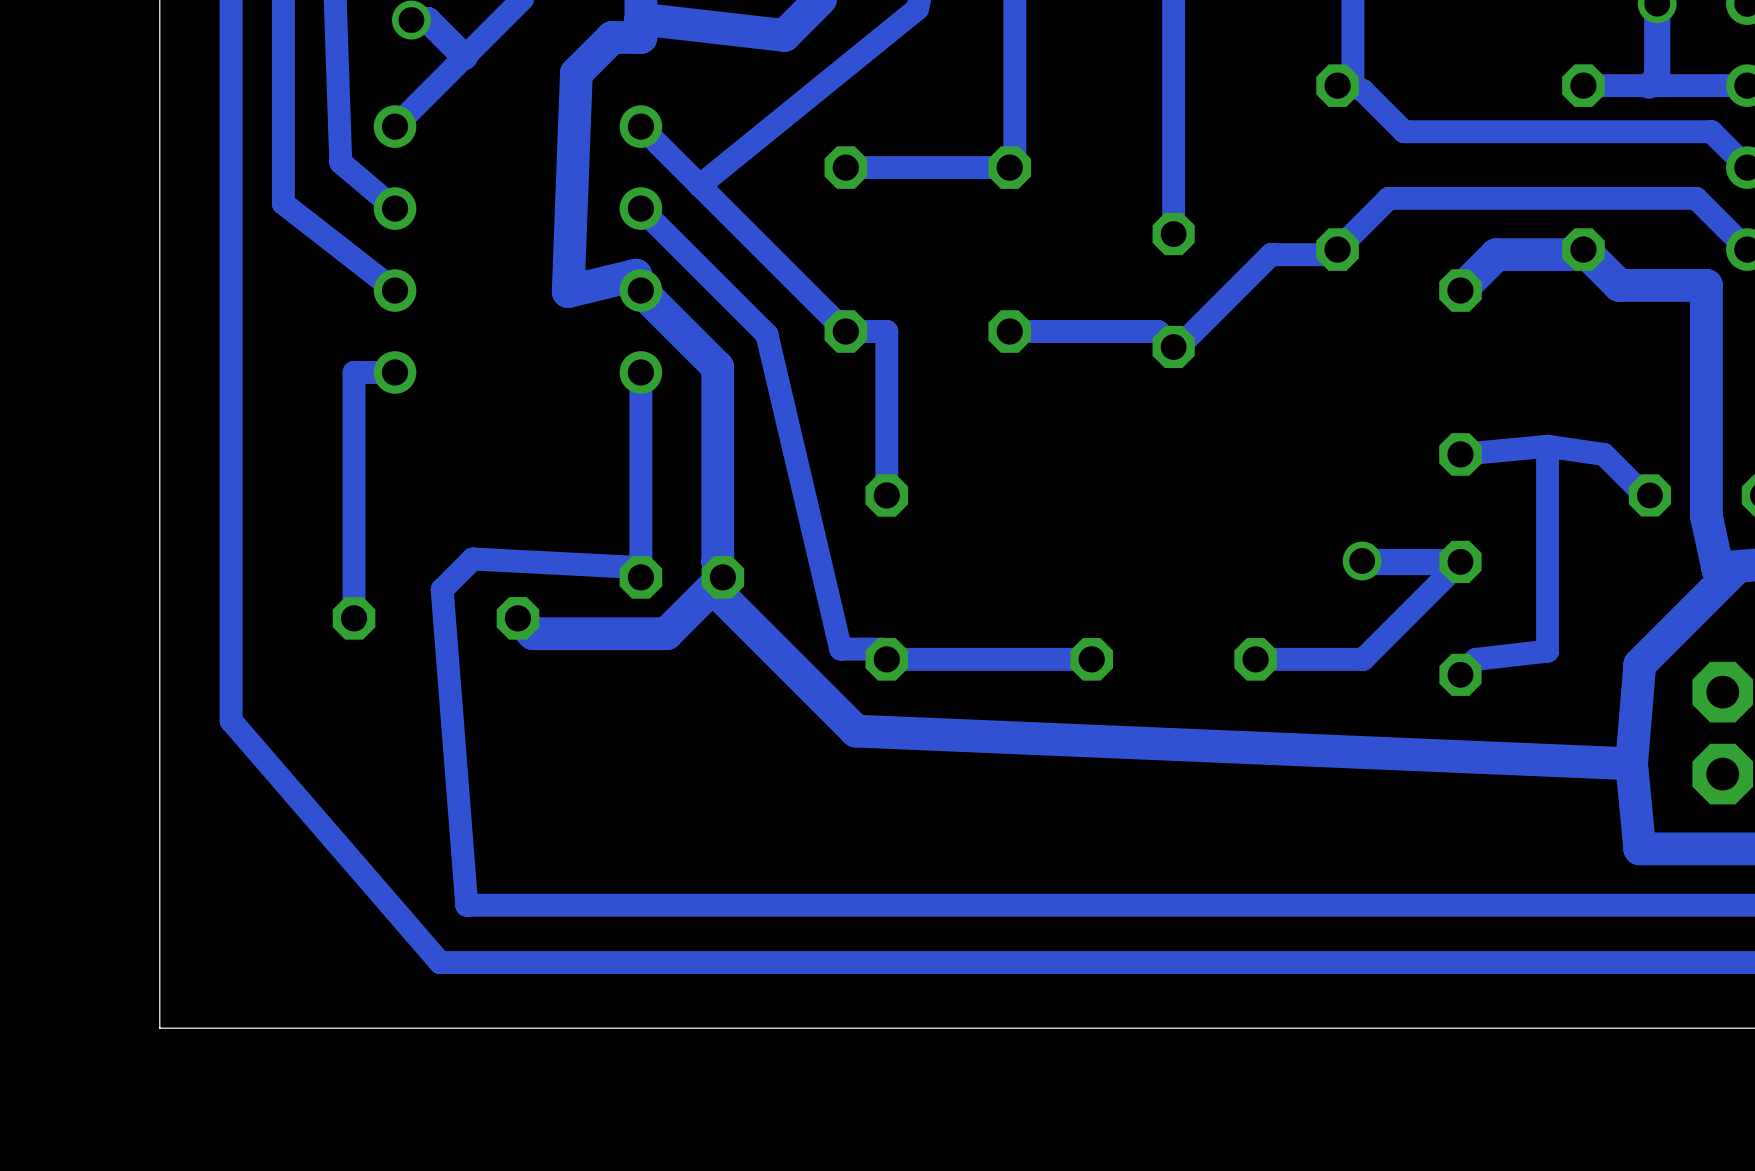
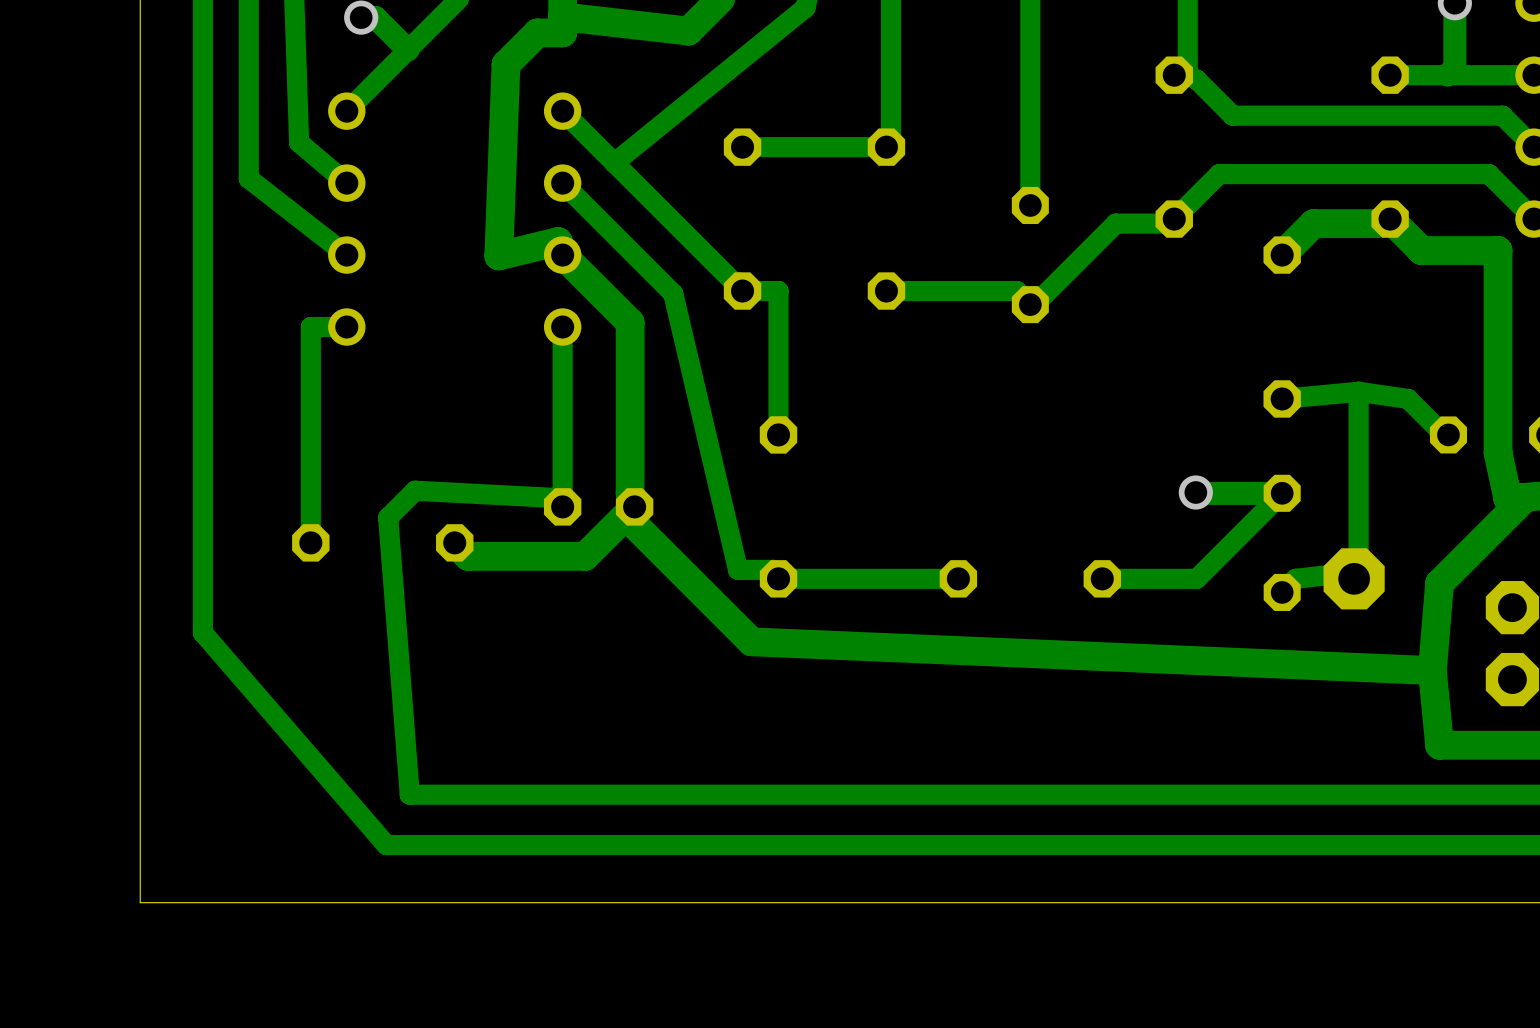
part: none -> (1354, 578)

